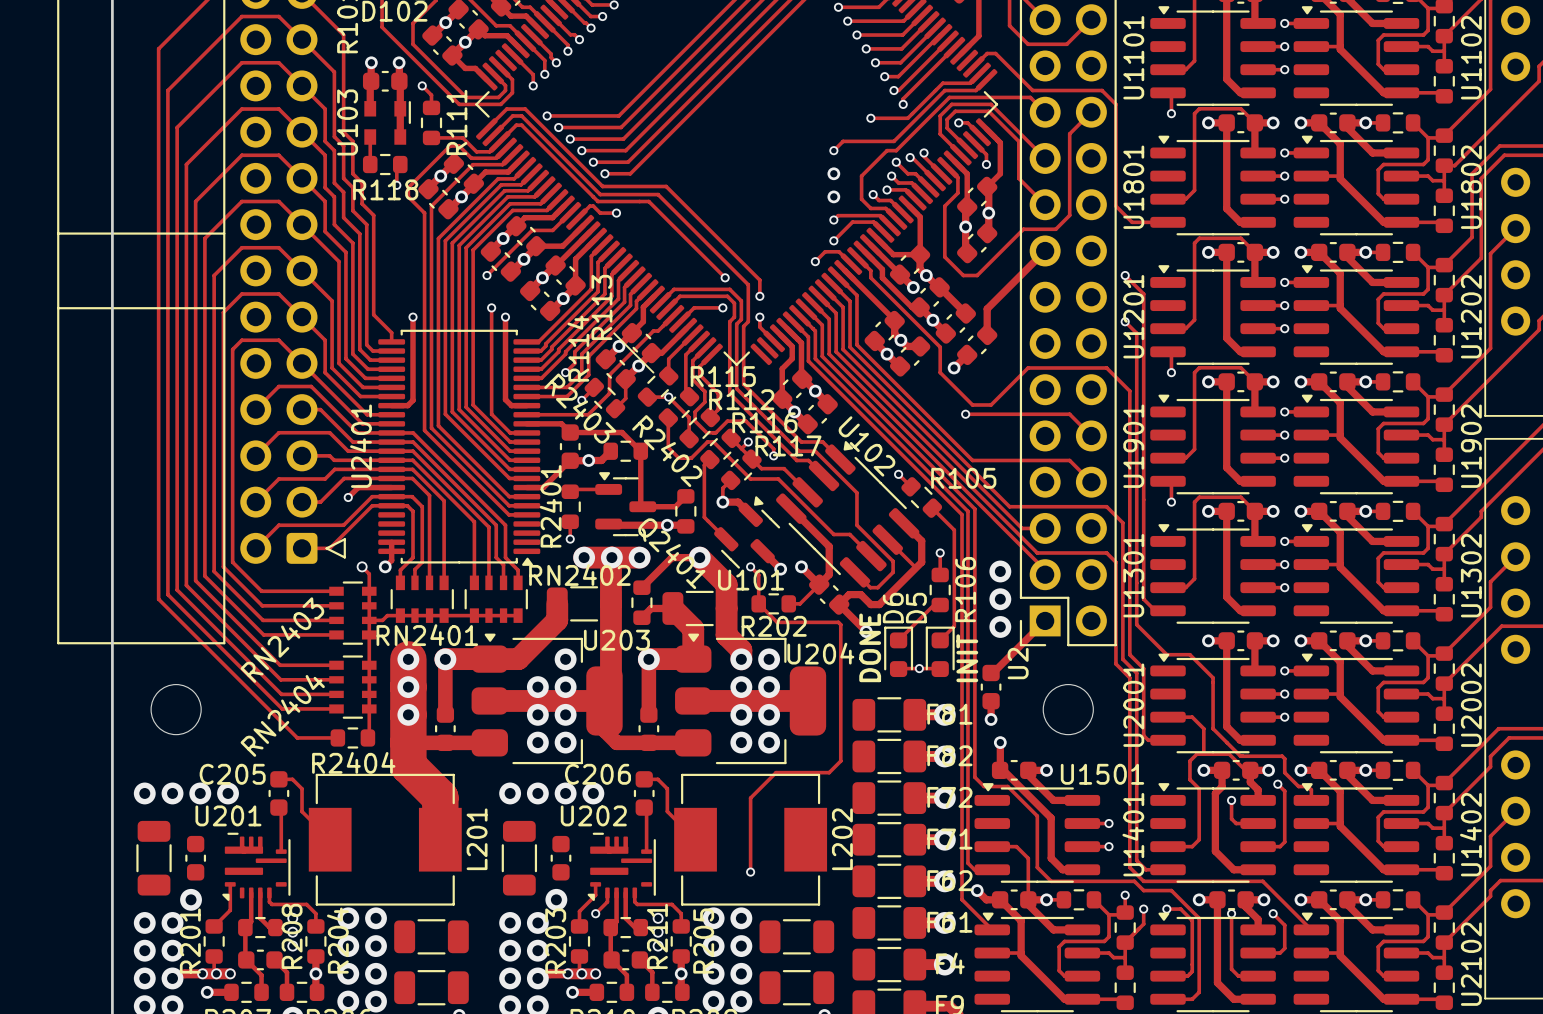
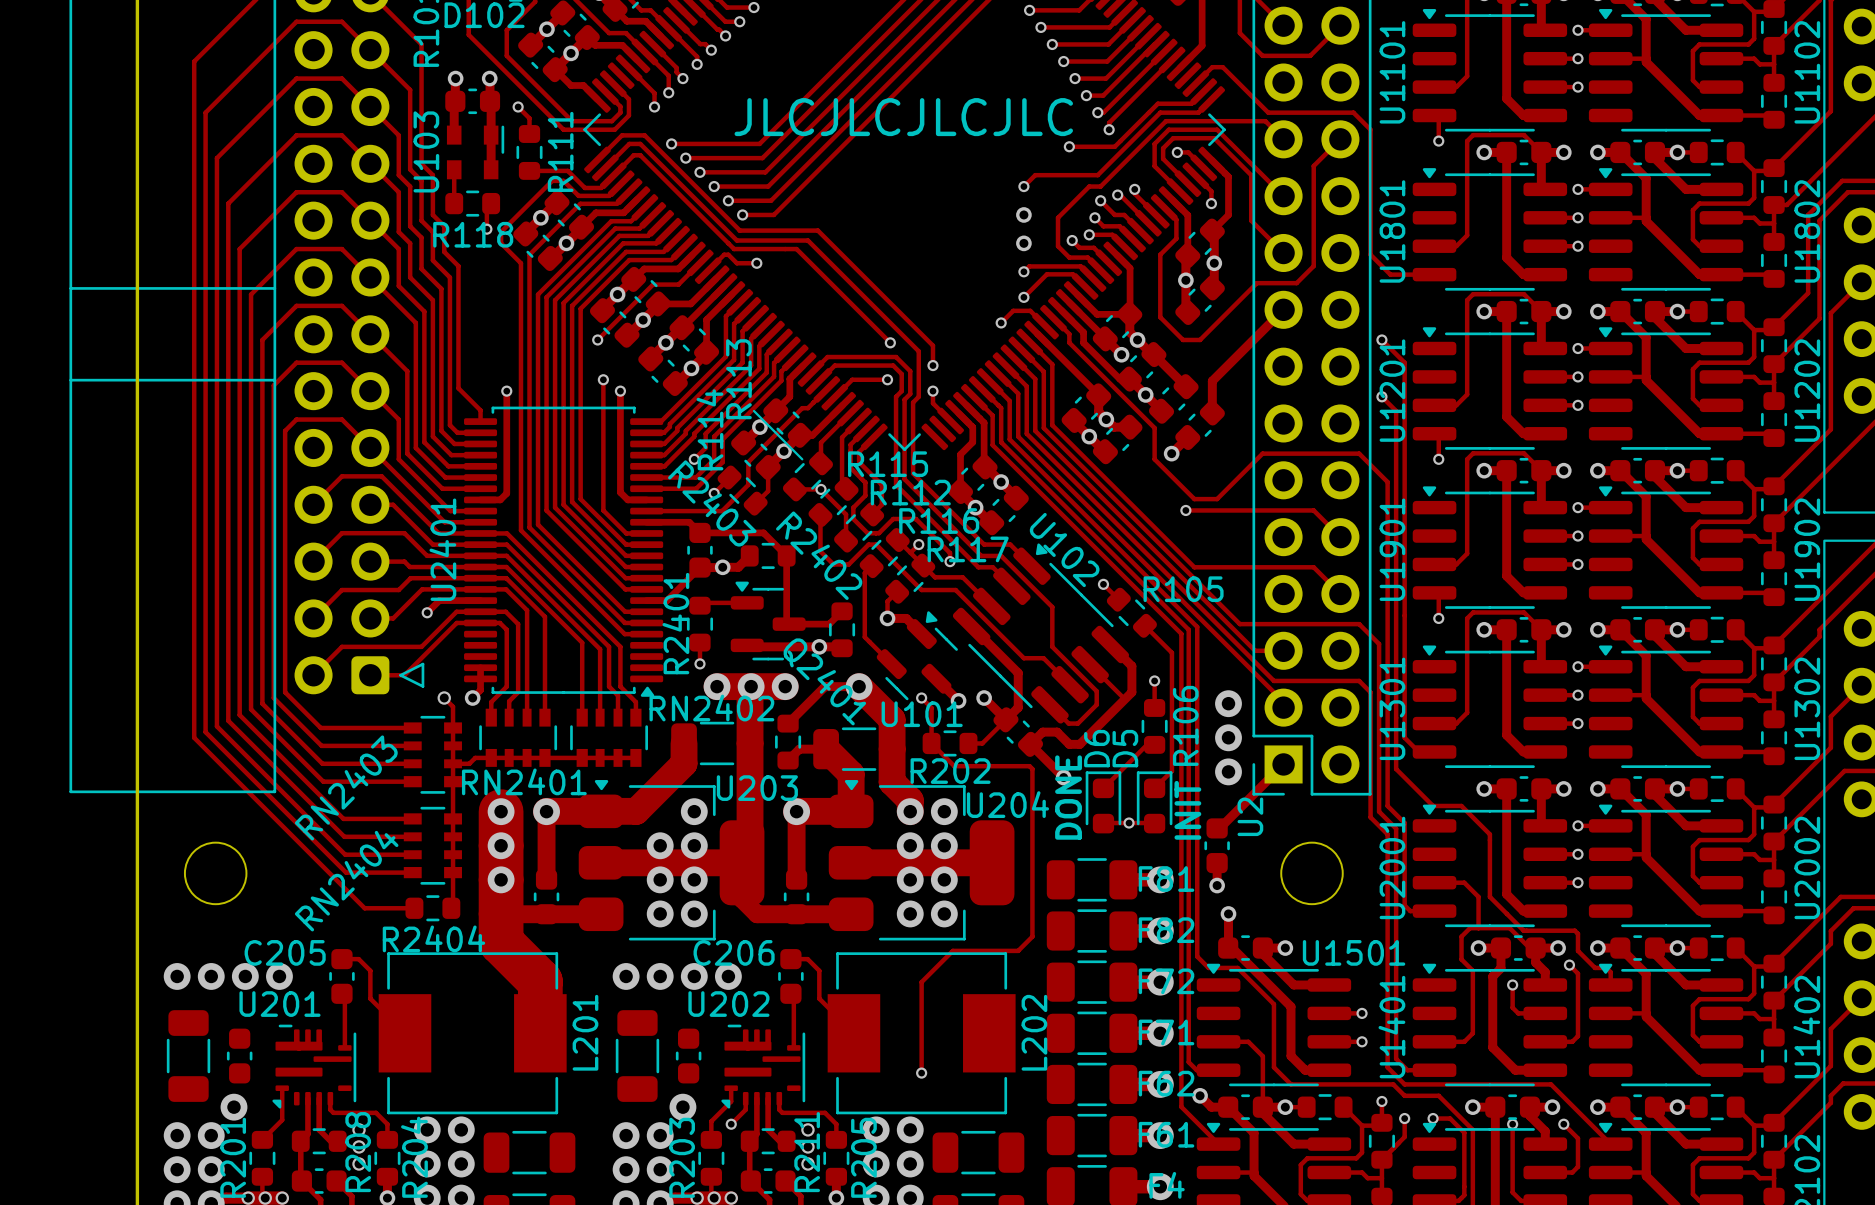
text: none -> JLCJLCJLCJLC (903, 117)

